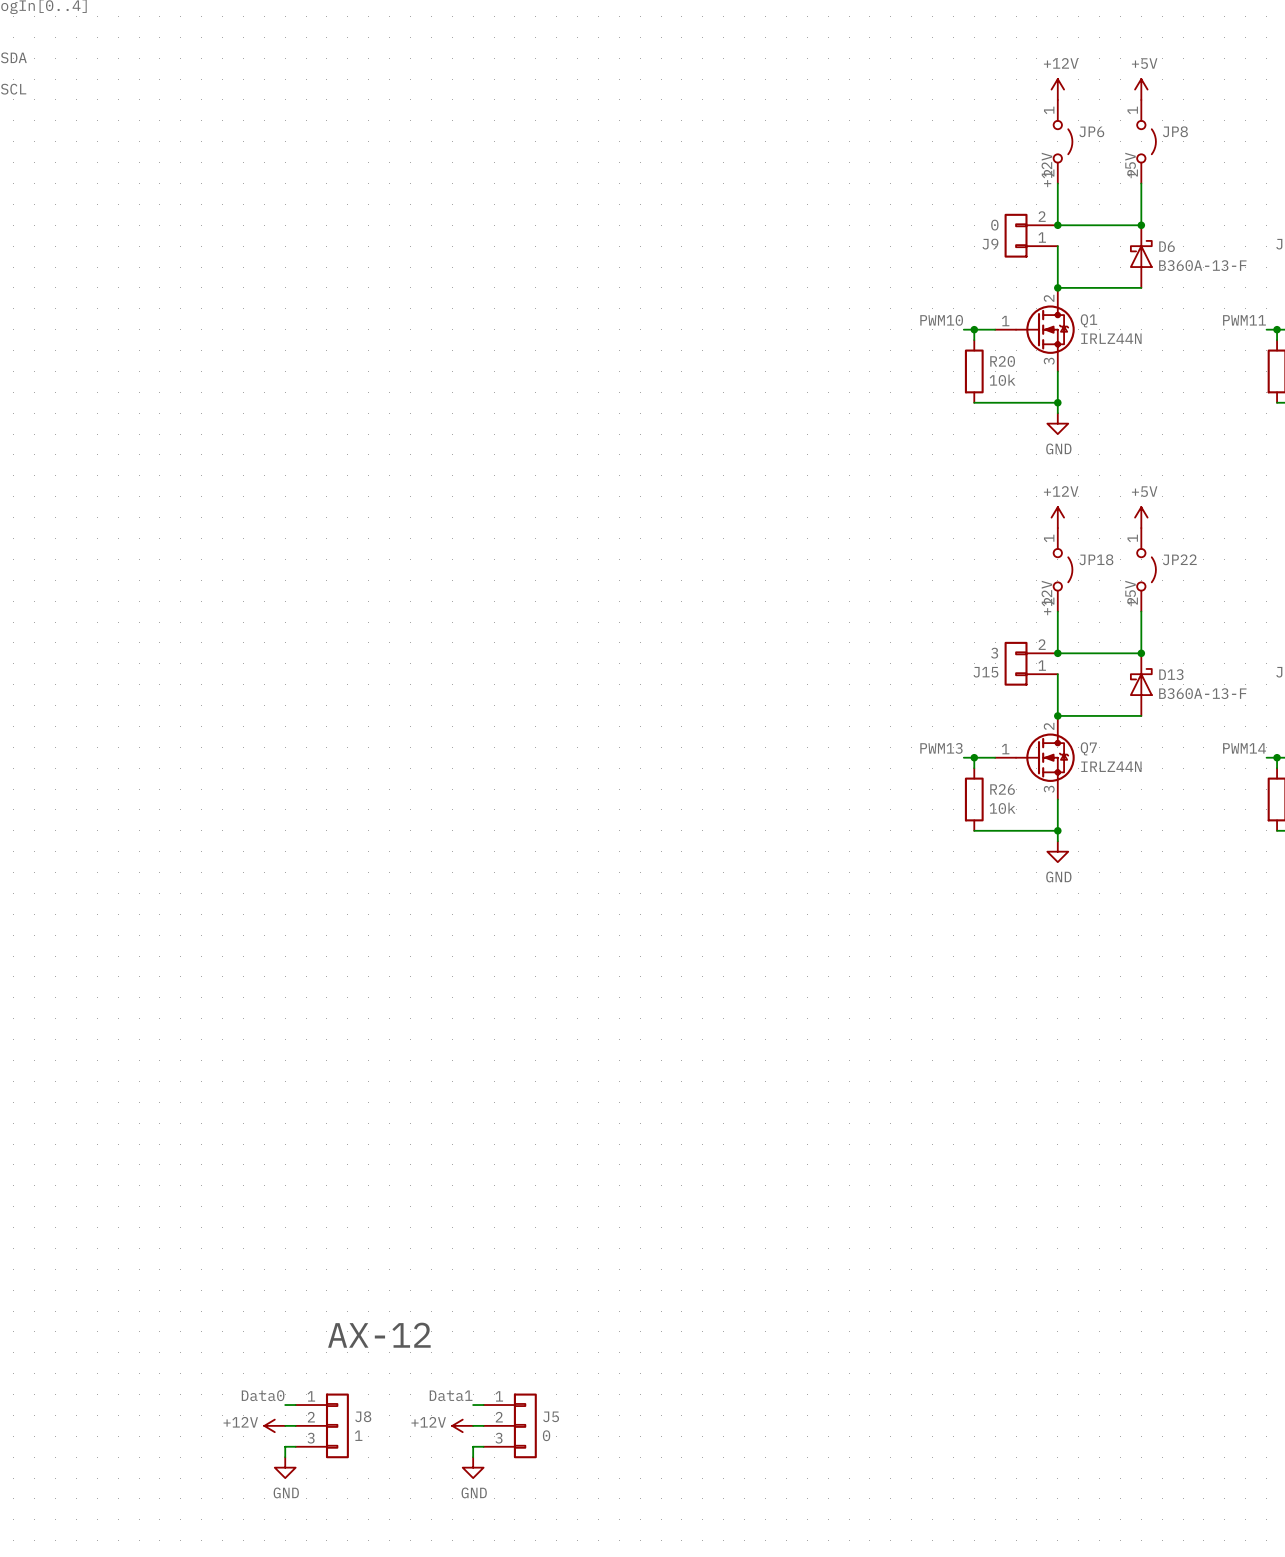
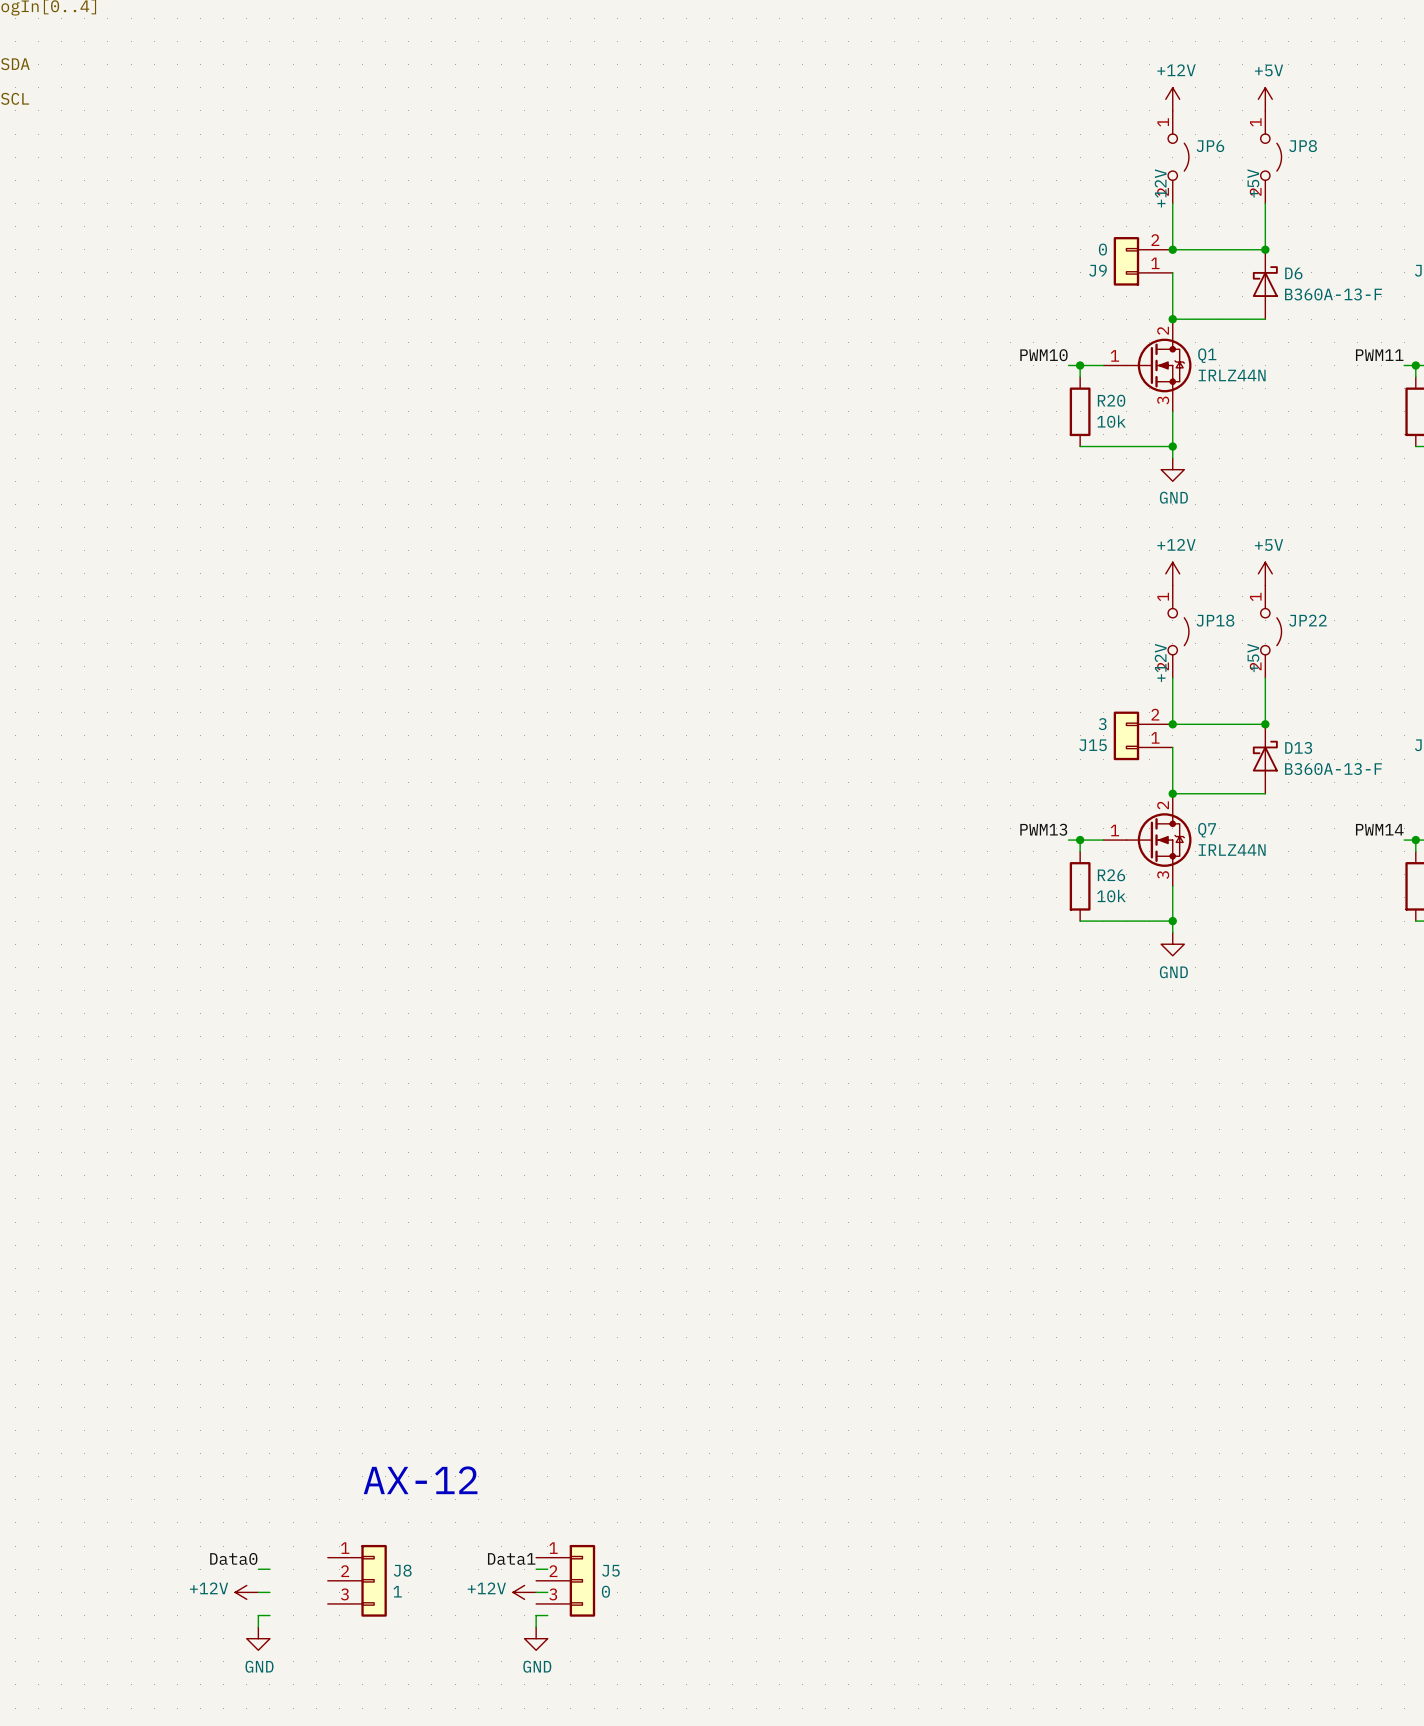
label position: Data0 (263, 1395) -> Data0 (233, 1558)
label position: Data1 (451, 1395) -> Data1 (511, 1559)
wire: (285, 1405) (295, 1405) -> (258, 1569) (269, 1569)
wire: (473, 1405) (483, 1405) -> (536, 1569) (547, 1569)
power symbol position: +12V (274, 1425) -> +12V (246, 1592)
wire: (285, 1425) (295, 1425) -> (258, 1592) (269, 1592)
power symbol position: +12V (462, 1425) -> +12V (524, 1592)
wire: (473, 1425) (483, 1425) -> (536, 1592) (547, 1592)
wire: (295, 1446) (285, 1446) (285, 1457) -> (269, 1615) (258, 1615) (258, 1627)
wire: (483, 1446) (473, 1446) (473, 1457) -> (547, 1615) (536, 1615) (536, 1627)
power symbol position: GND (285, 1467) -> GND (258, 1638)
power symbol position: GND (473, 1467) -> GND (536, 1638)

